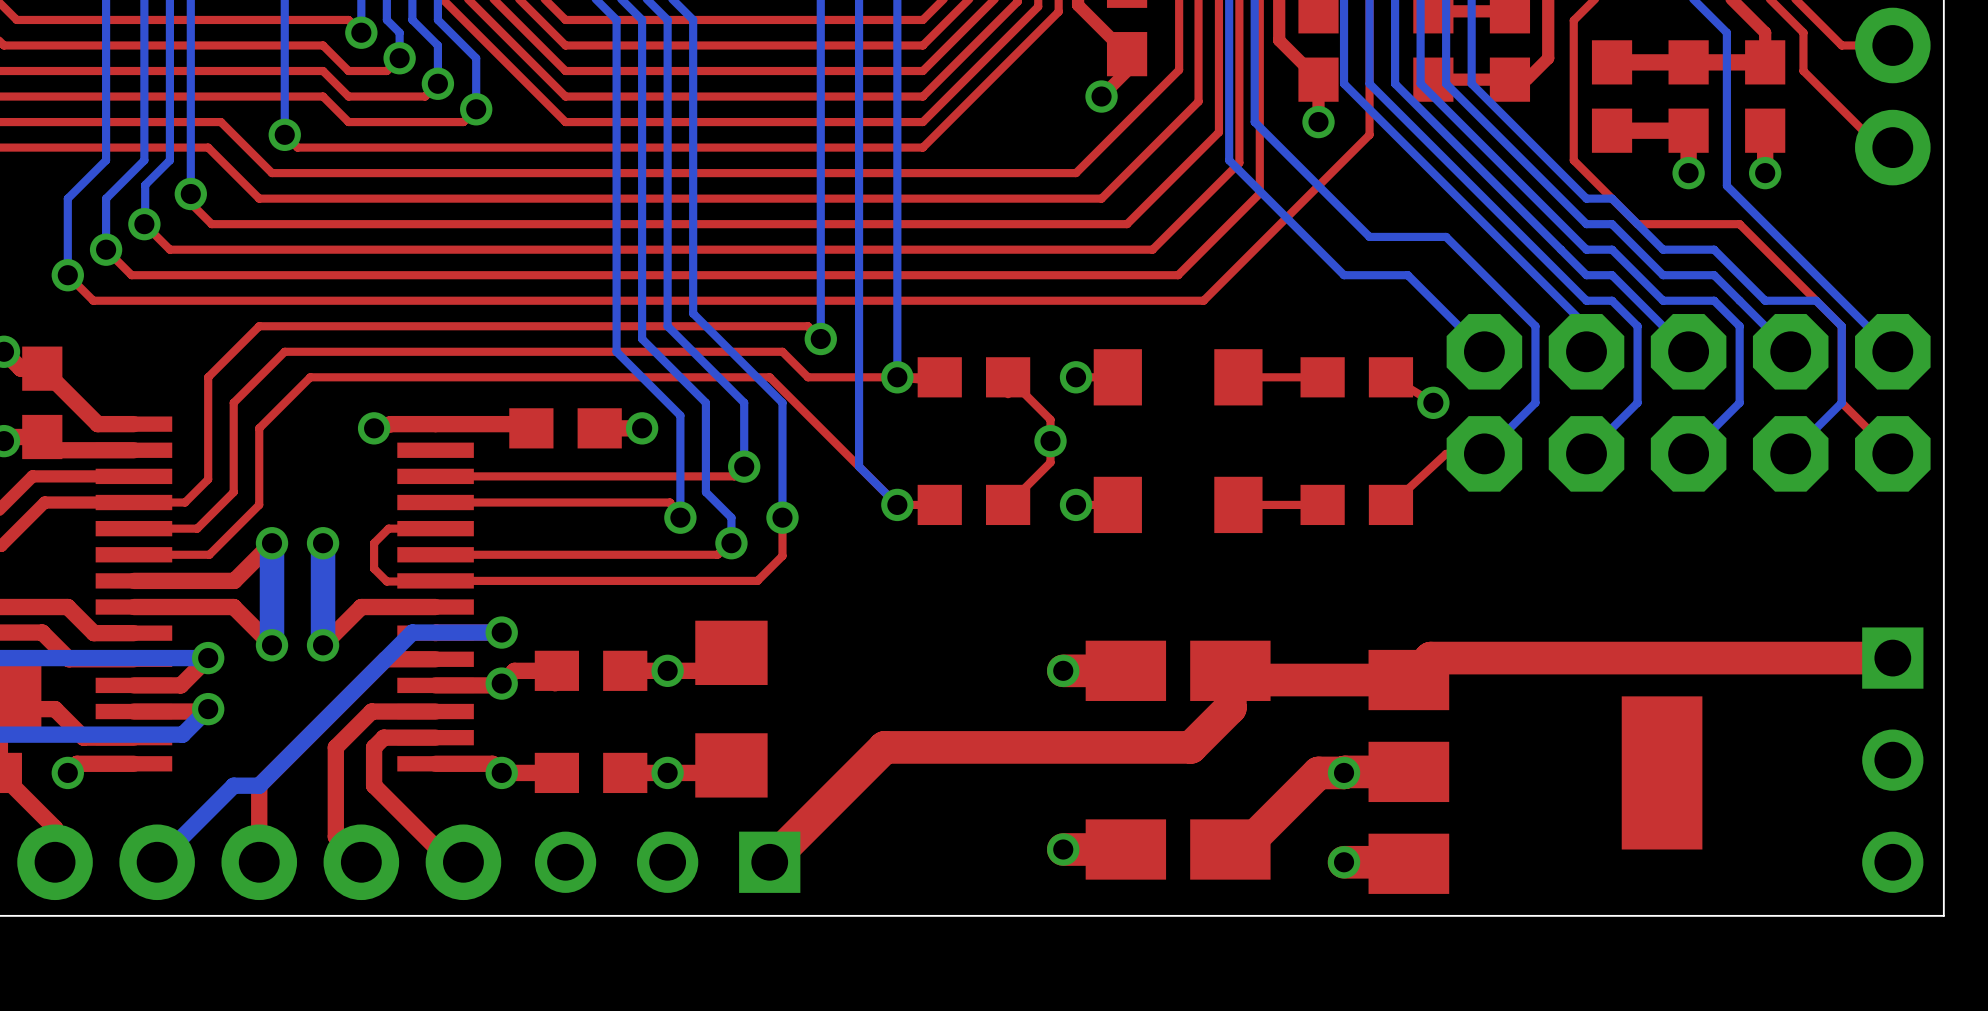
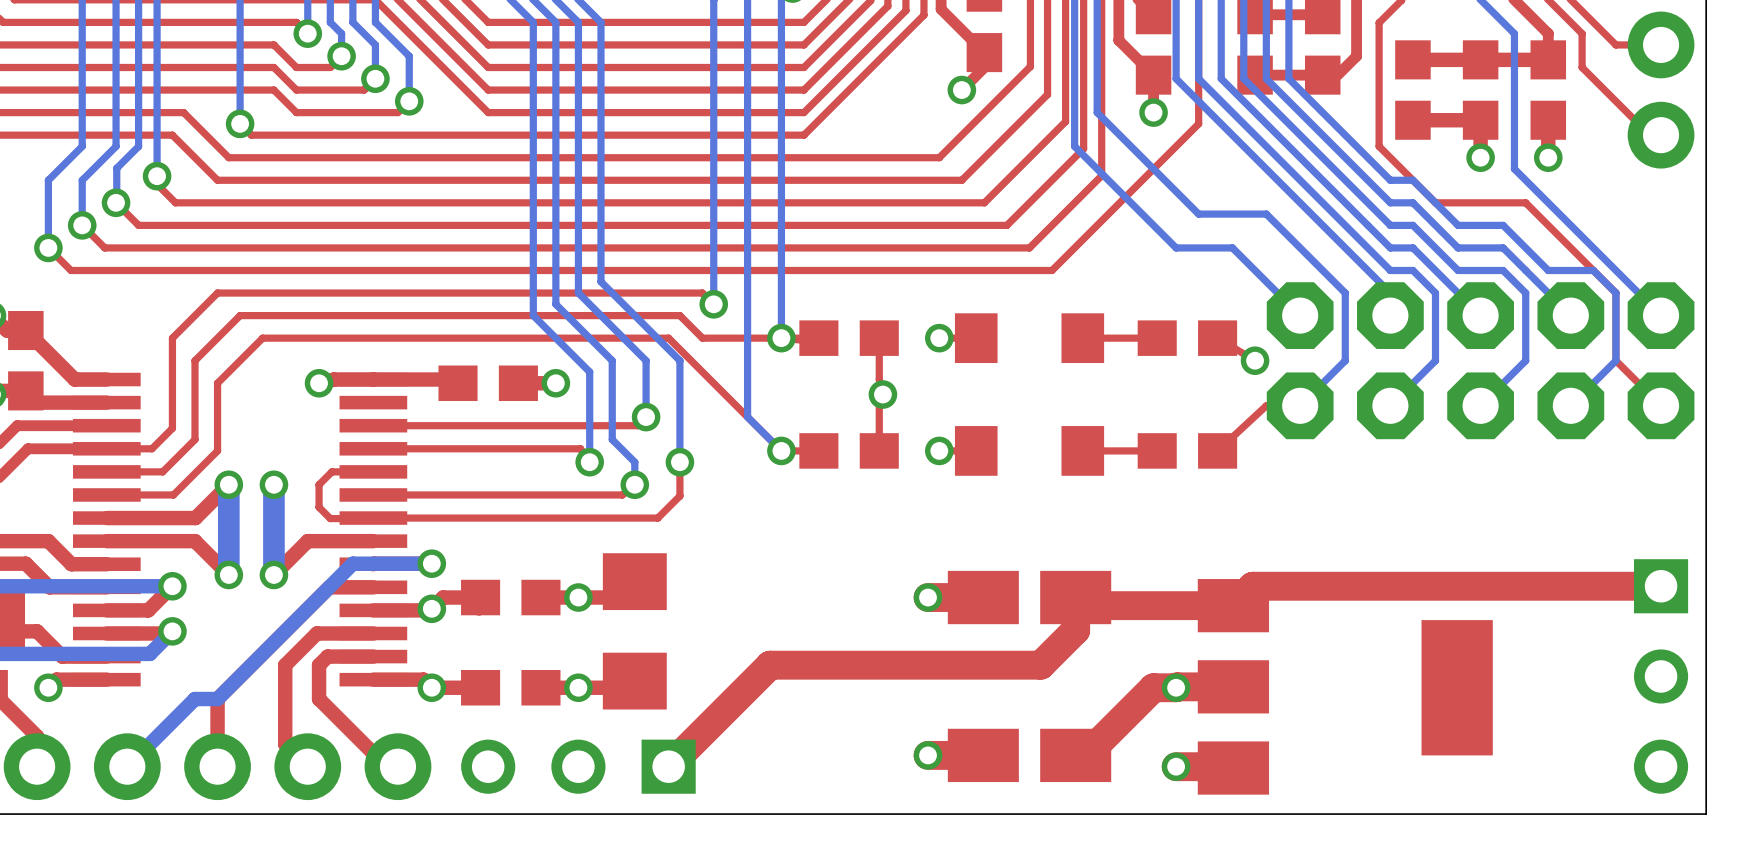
top track: (1008, 377) (1050, 419) (1050, 462) (1008, 504) -> (879, 353) (879, 379) (882, 394) (879, 386) (879, 450)
via position: (1050, 441) -> (882, 394)

